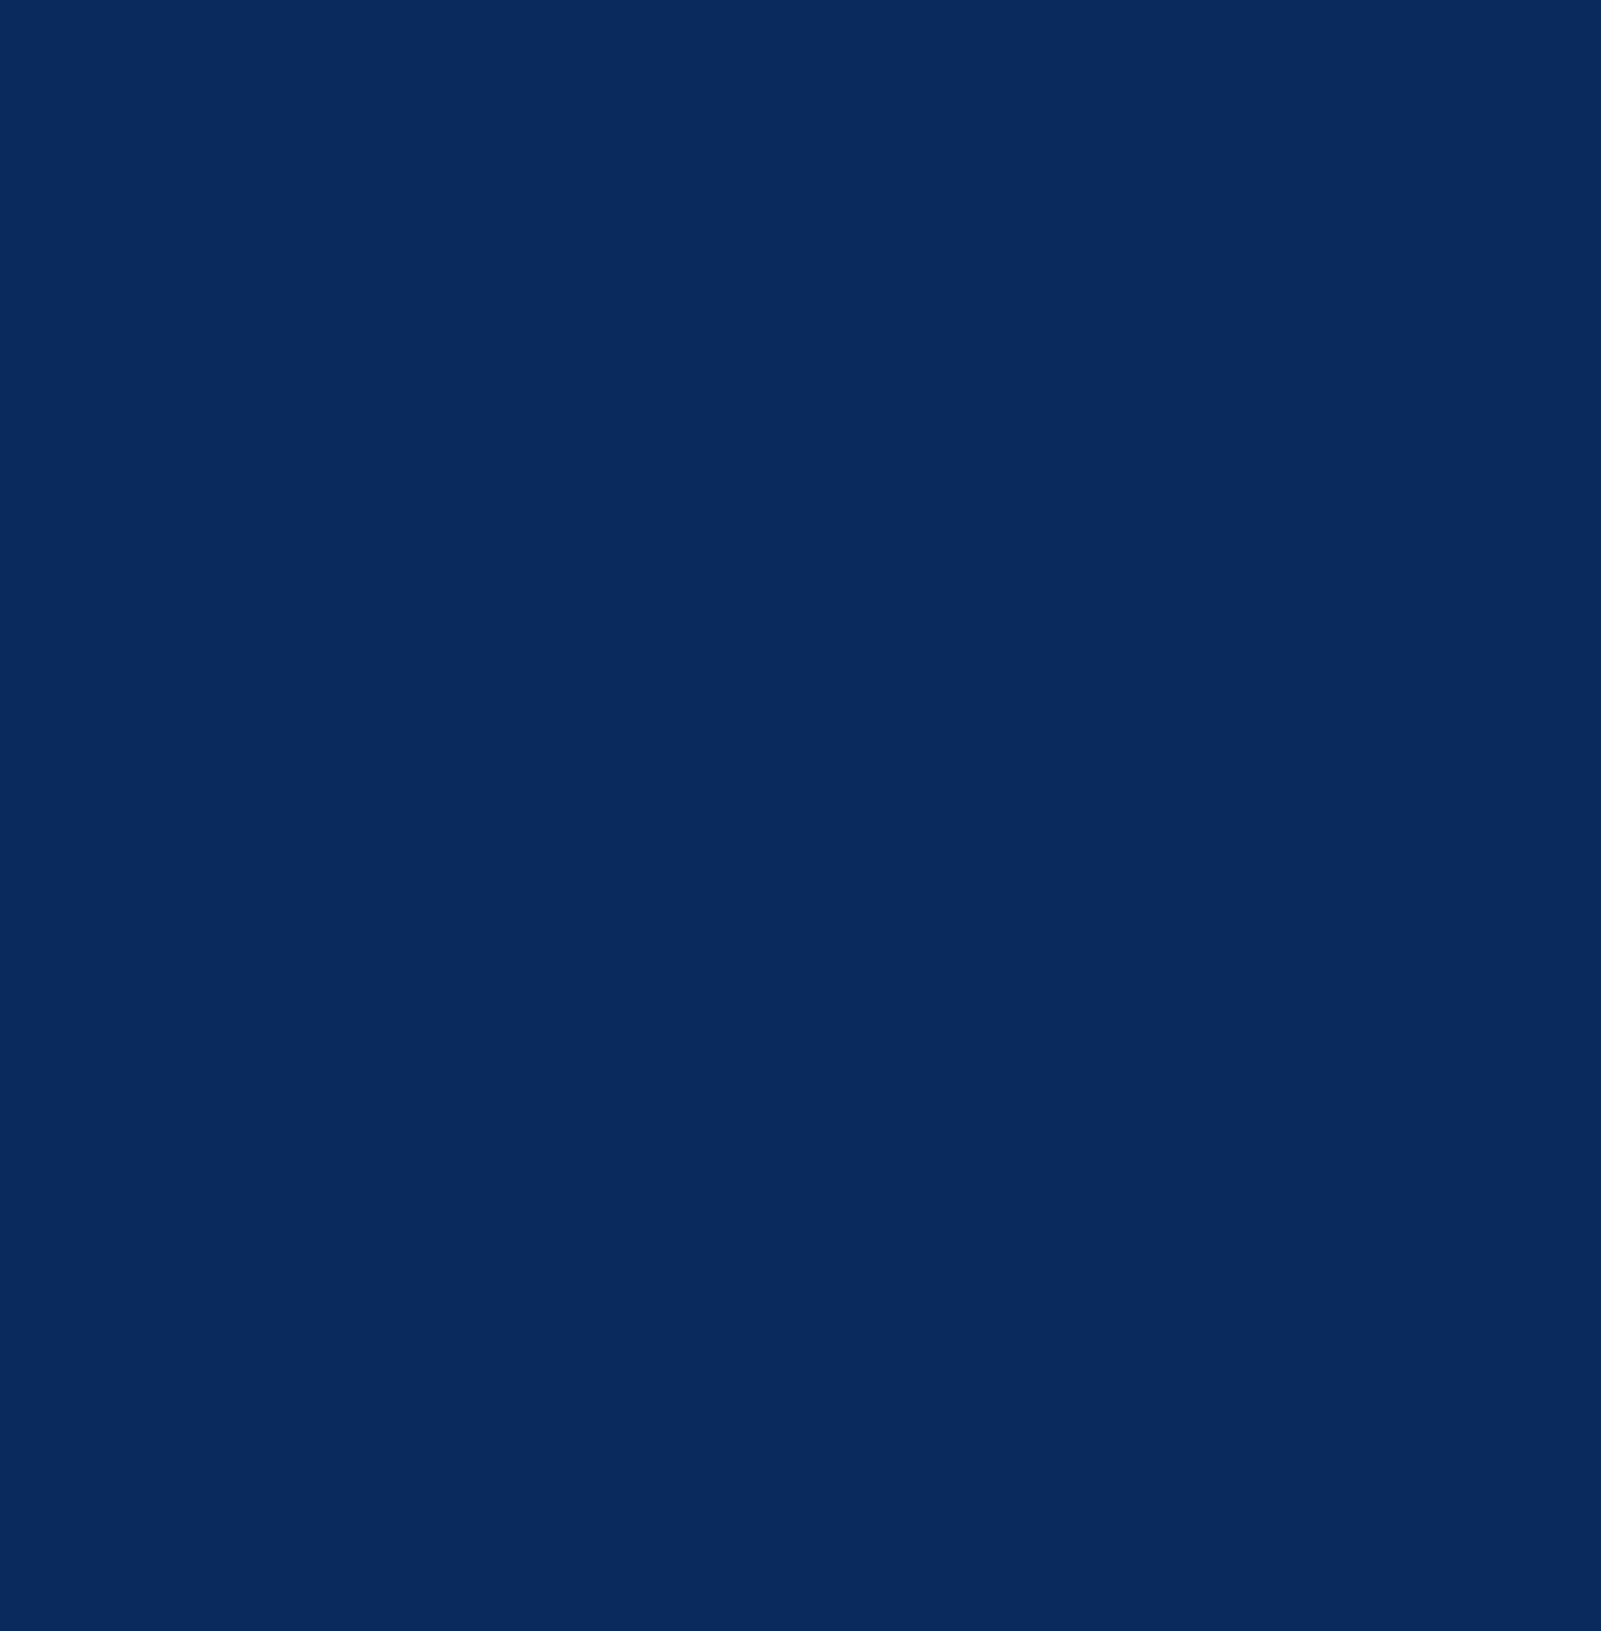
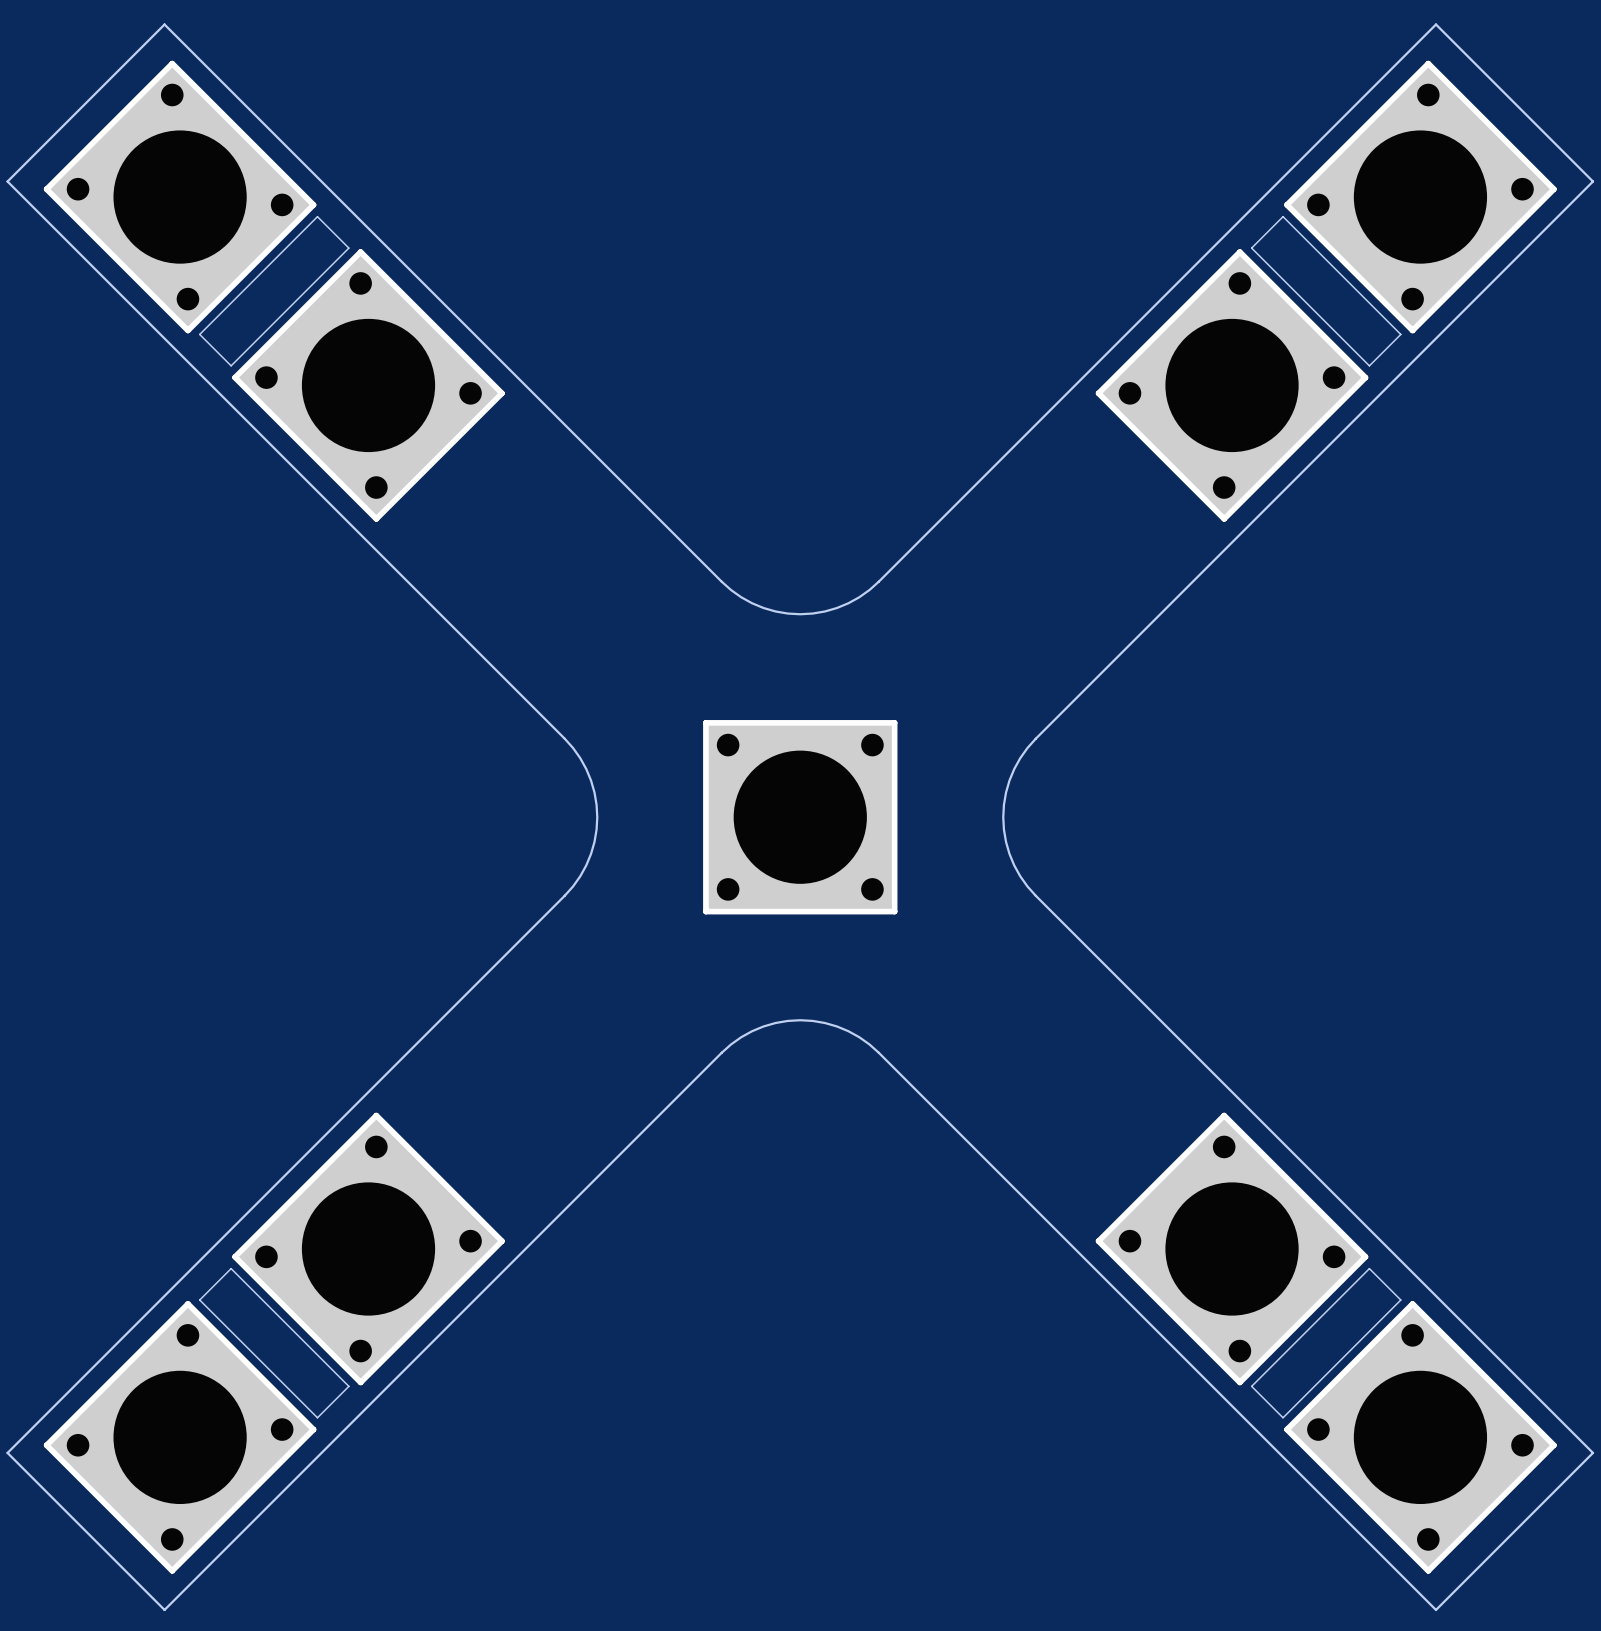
board edge: none -> (164, 24) (721, 581) (752, 603) (787, 613) (812, 613) (836, 608) (859, 597) (878, 581) (1435, 24) (1592, 181) (1035, 738) (1014, 769) (1003, 804) (1003, 829) (1009, 853) (1020, 876) (1035, 895) (1592, 1452) (1435, 1609) (878, 1052) (848, 1031) (812, 1020) (787, 1020) (763, 1026) (741, 1037) (721, 1052) (164, 1609) (7, 1452) (564, 895) (586, 865) (596, 829) (596, 804) (591, 780) (580, 758) (564, 738) (7, 181) (164, 24)
part: none -> (180, 197)
part: none -> (1420, 197)
board edge: none -> (317, 216) (199, 334) (231, 365) (348, 248) (317, 216)
board edge: none -> (1283, 216) (1251, 248) (1369, 365) (1400, 334) (1283, 216)
part: none -> (368, 385)
part: none -> (1232, 385)
part: none -> (800, 817)
part: none -> (368, 1249)
part: none -> (1232, 1249)
board edge: none -> (231, 1268) (348, 1386) (317, 1417) (199, 1300) (231, 1268)
board edge: none -> (1369, 1268) (1400, 1300) (1283, 1417) (1251, 1386) (1369, 1268)
part: none -> (180, 1437)
part: none -> (1420, 1437)

